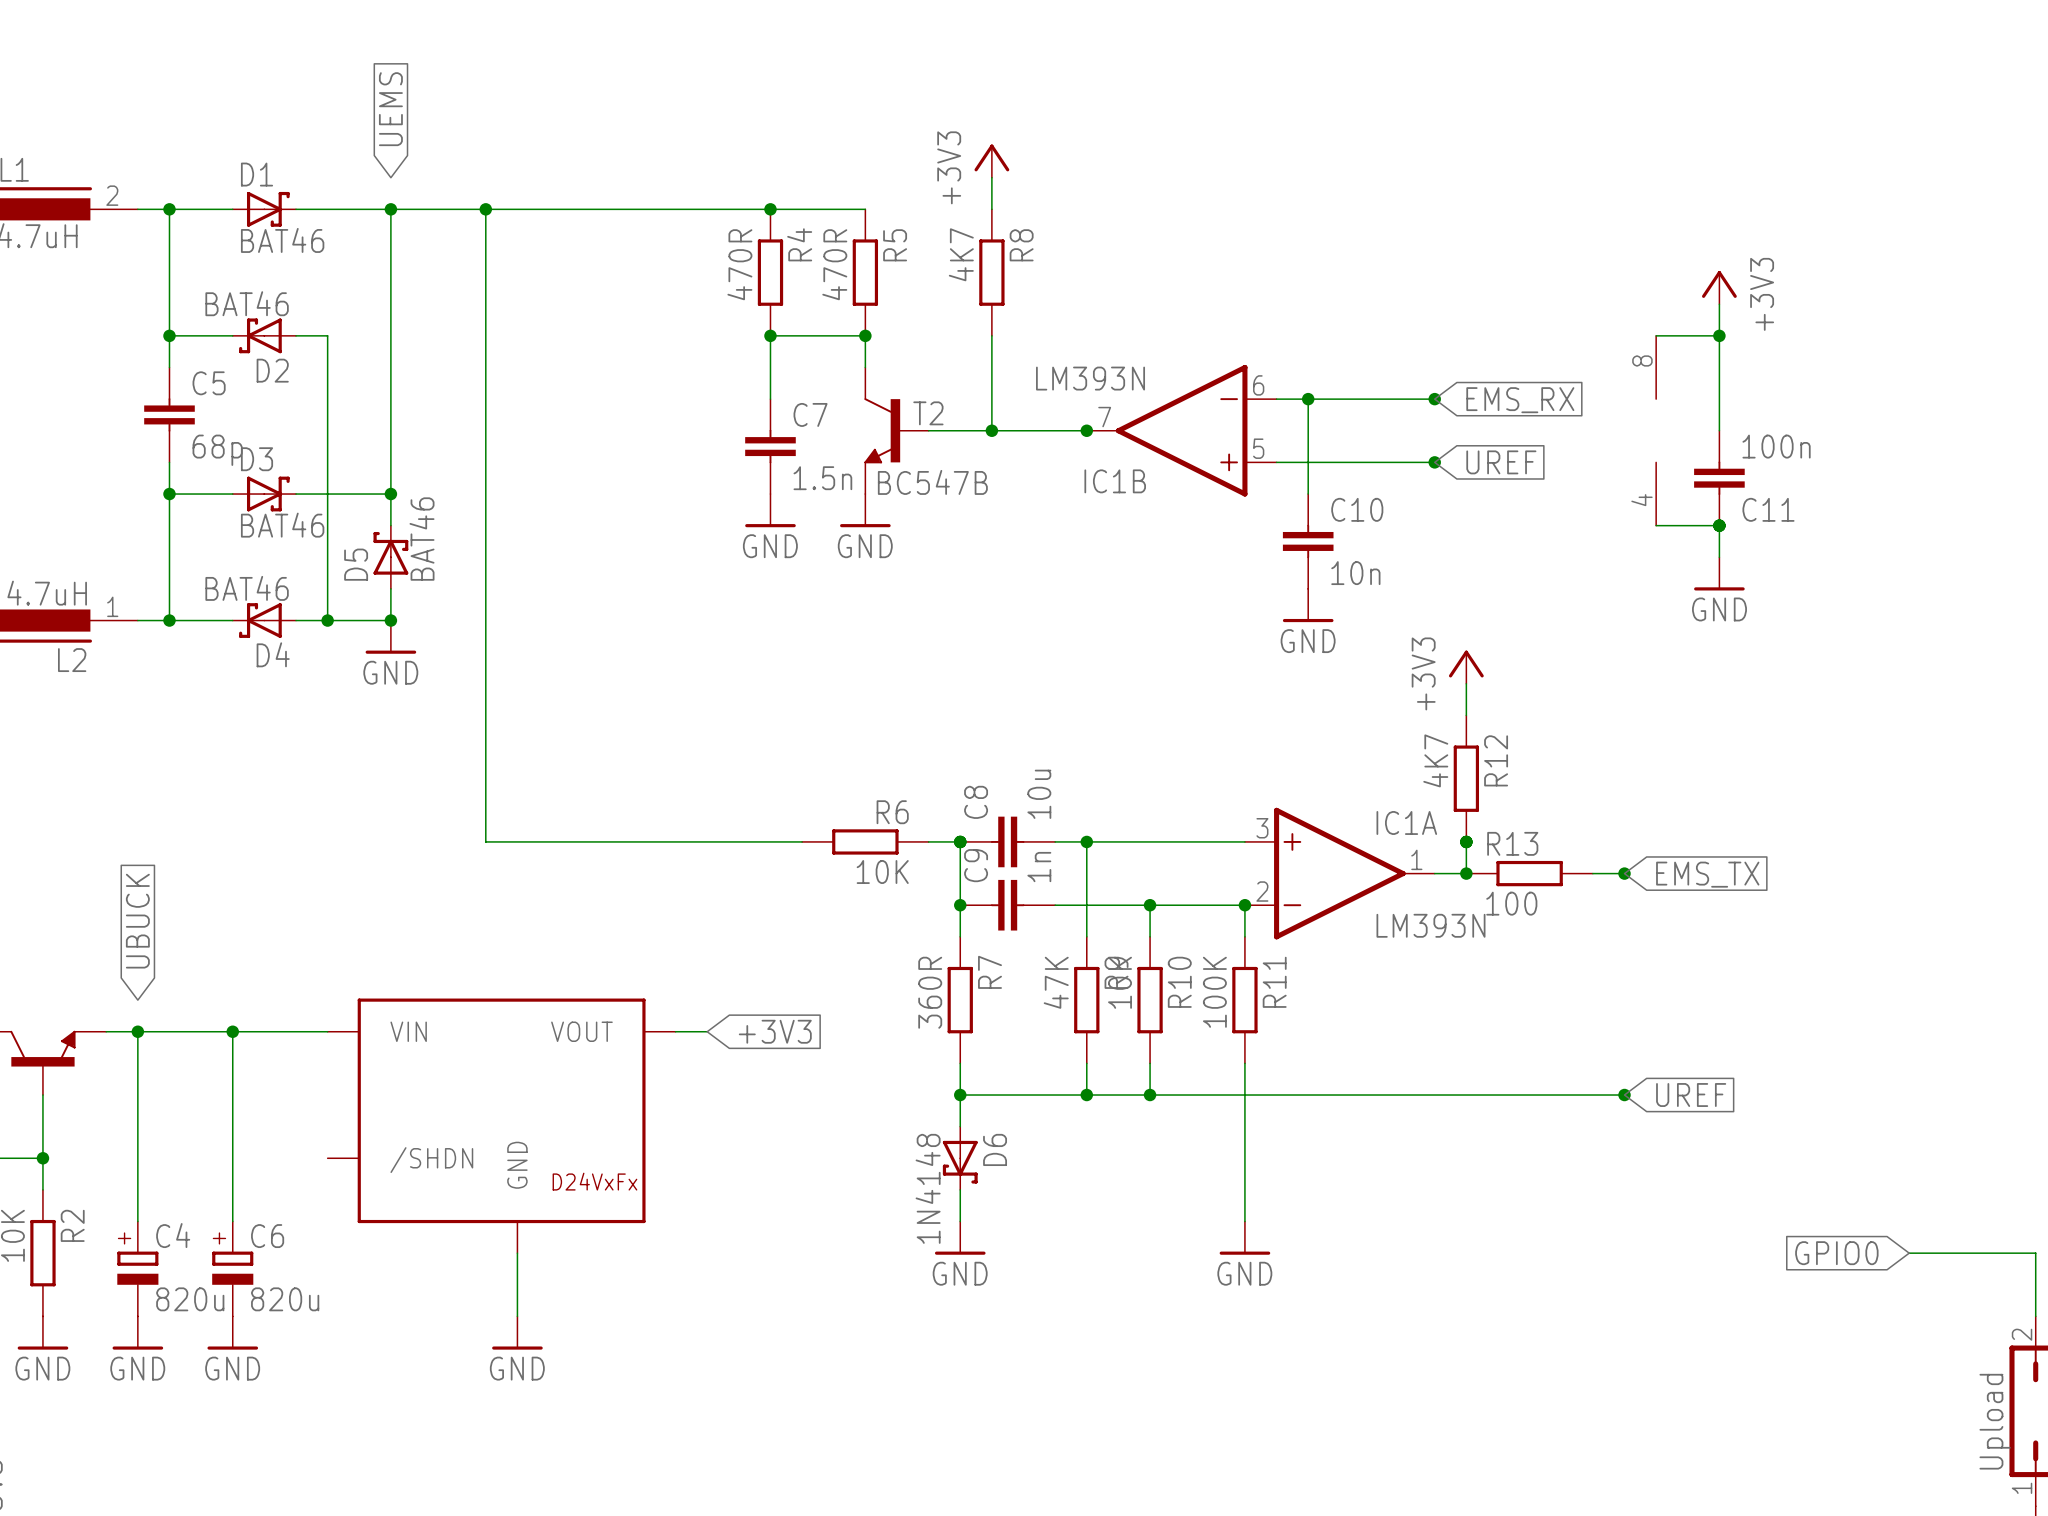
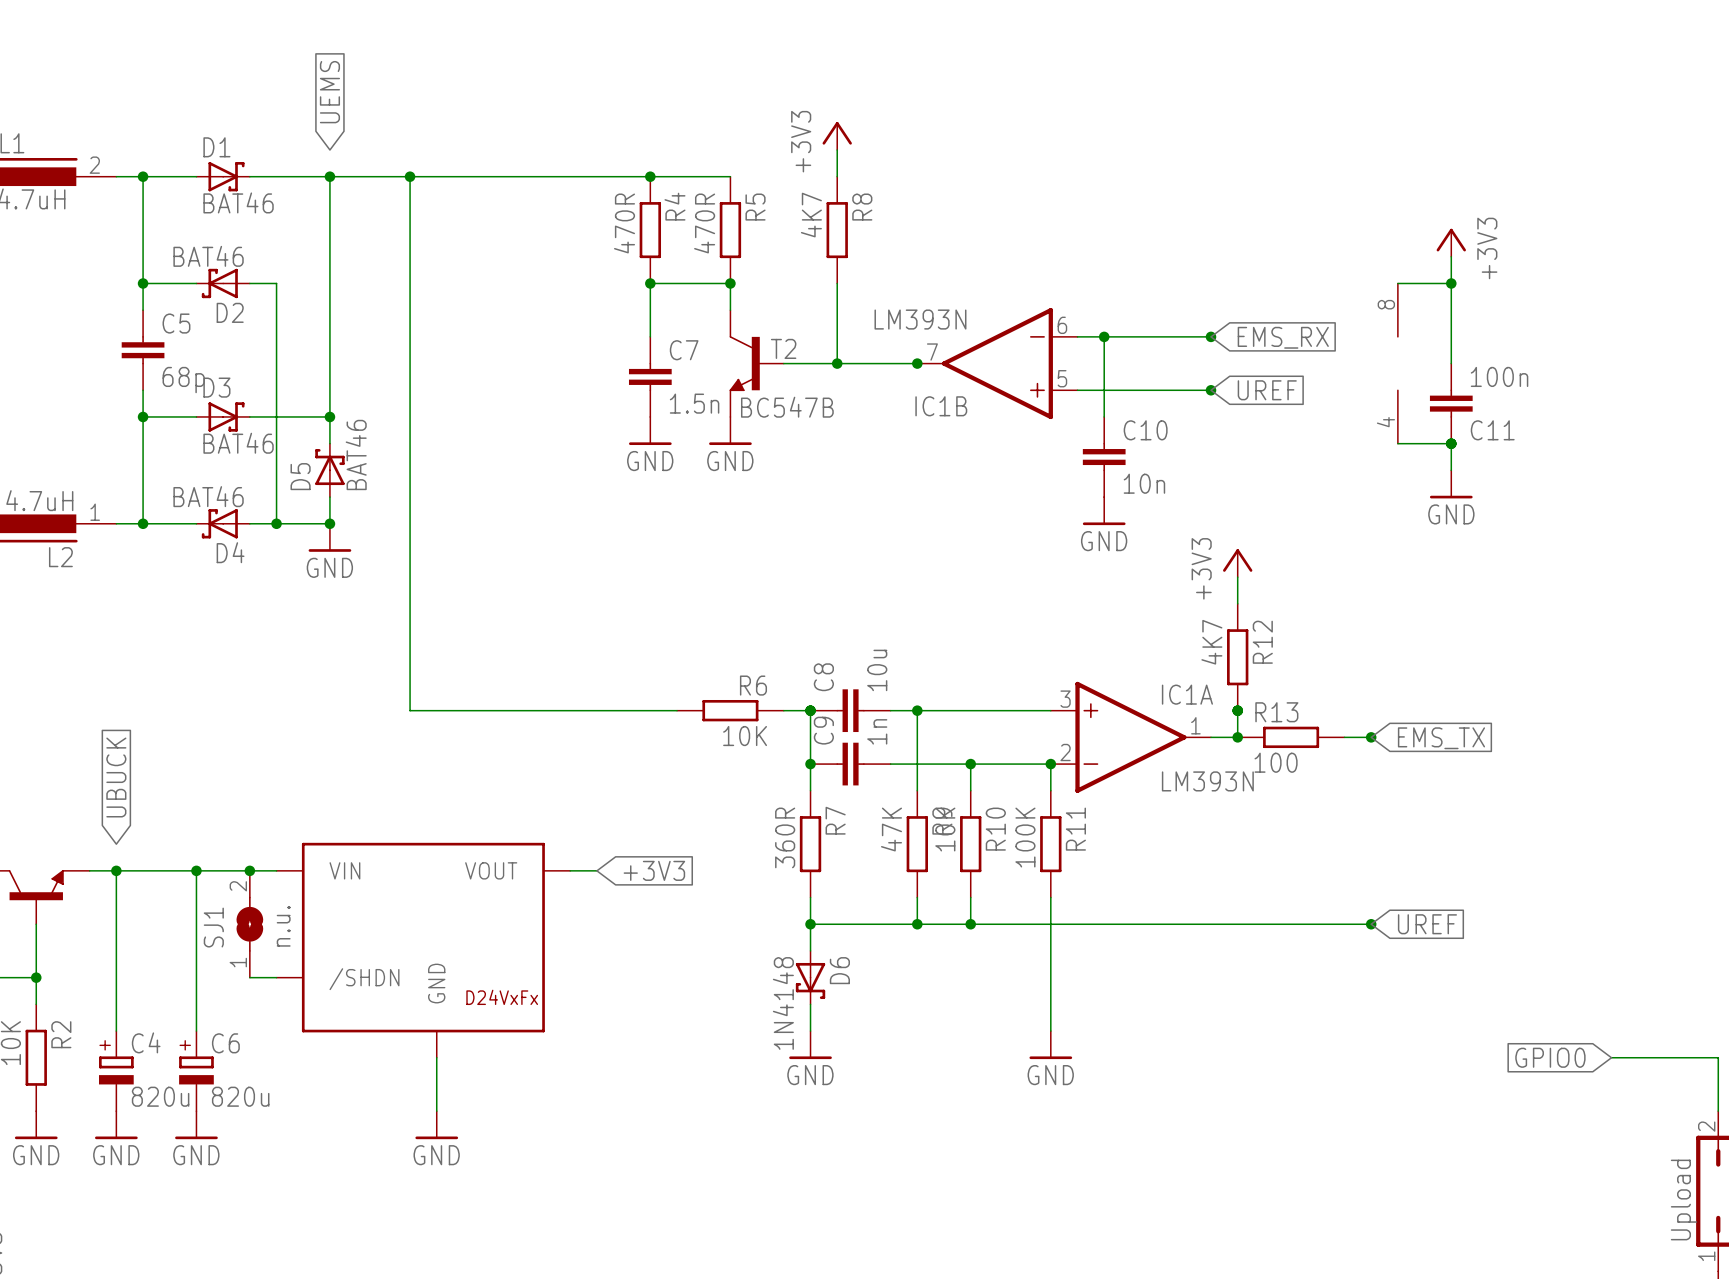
junction: none -> (249, 870)
SJ1: none -> n.u. (249, 924)
wire: none -> (249, 977) (276, 977)

